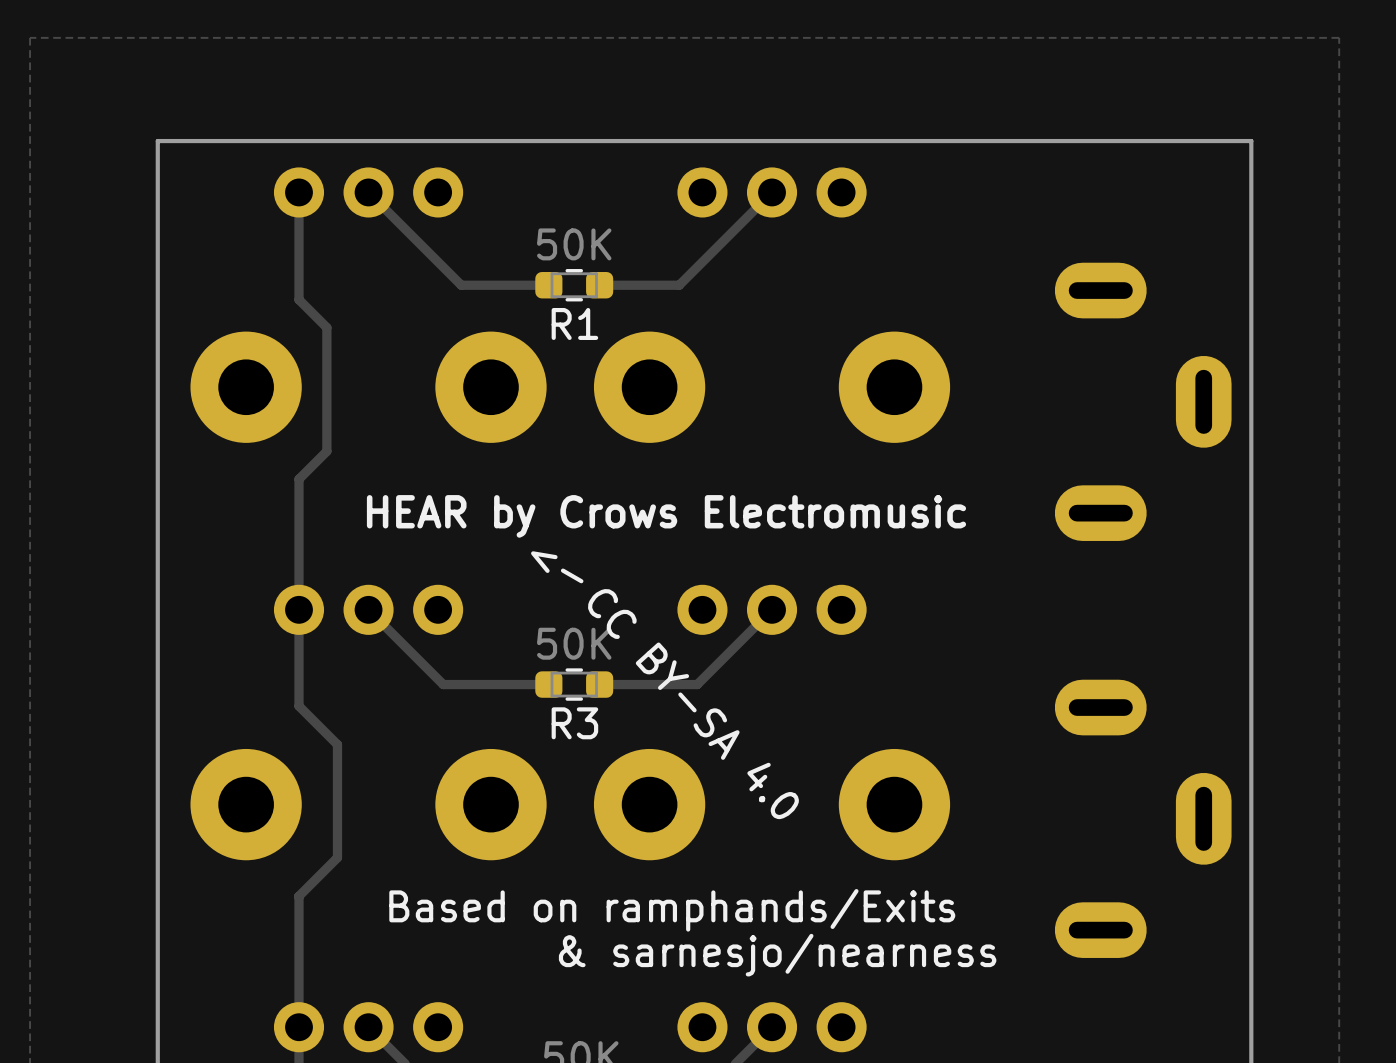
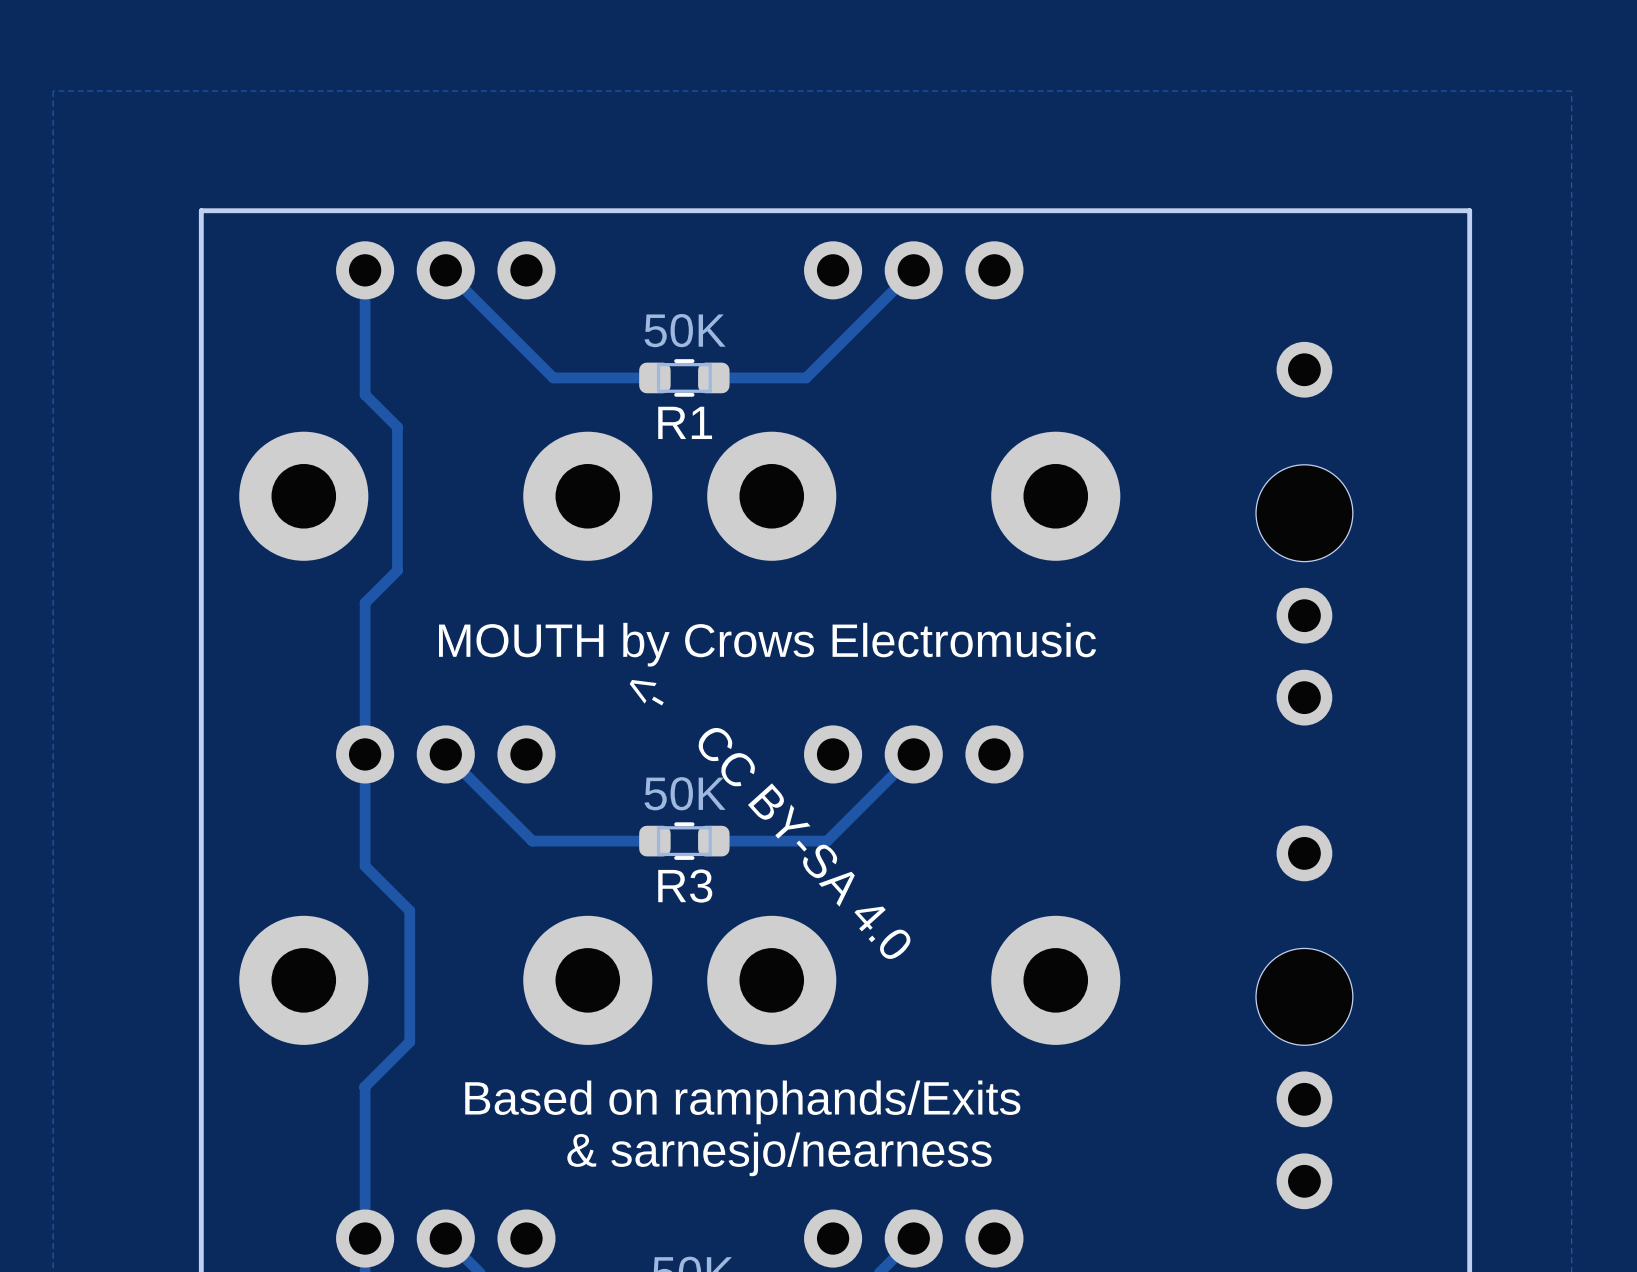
part: (1143, 401) -> none
part: none -> (1304, 533)
text: HEAR by Crows Electromusic (666, 516) -> MOUTH by Crows Electromusic (767, 644)
part: (1143, 818) -> none
part: none -> (1304, 1017)

